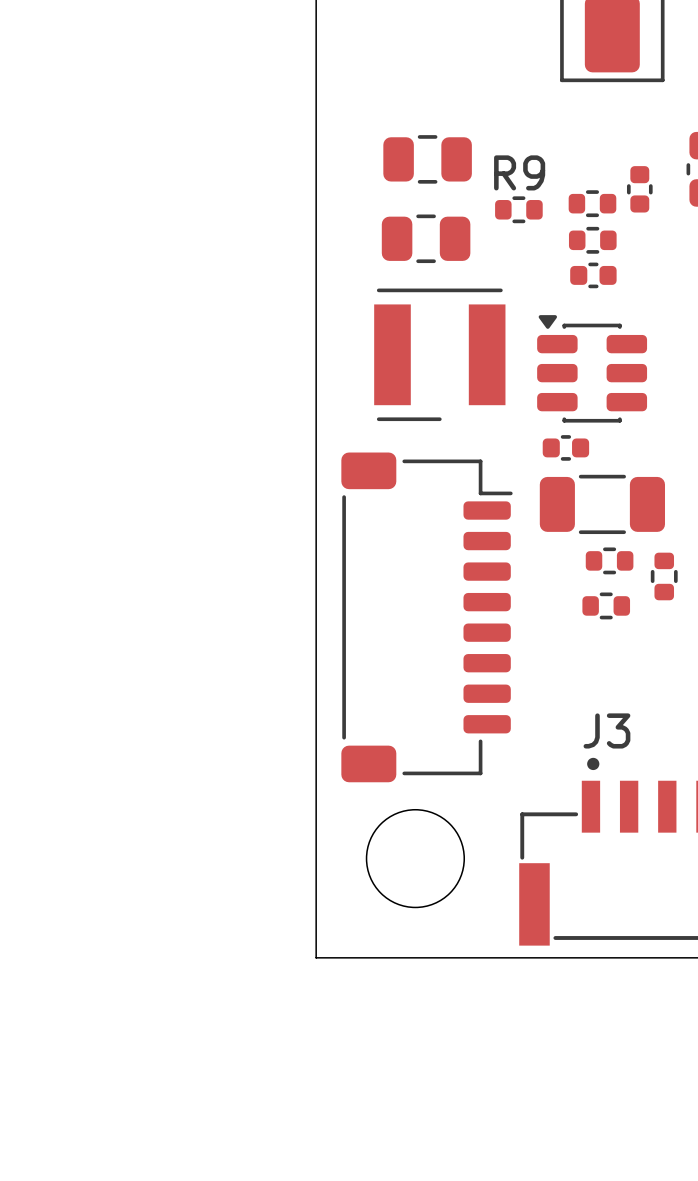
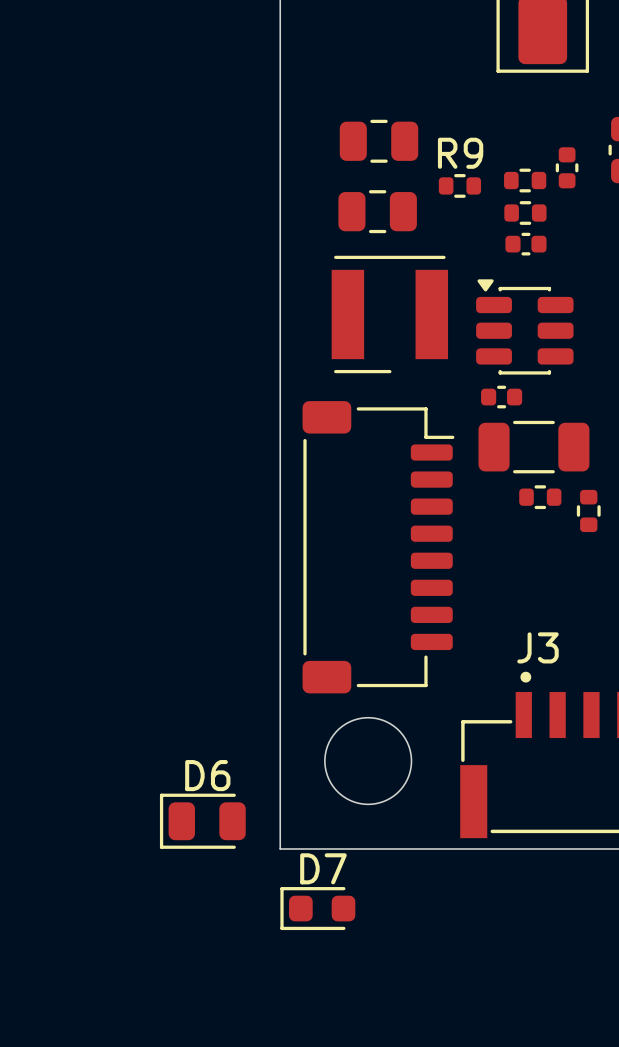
part: (606, 605) -> none
D6: none -> (202, 821)
D7: none -> (317, 908)

